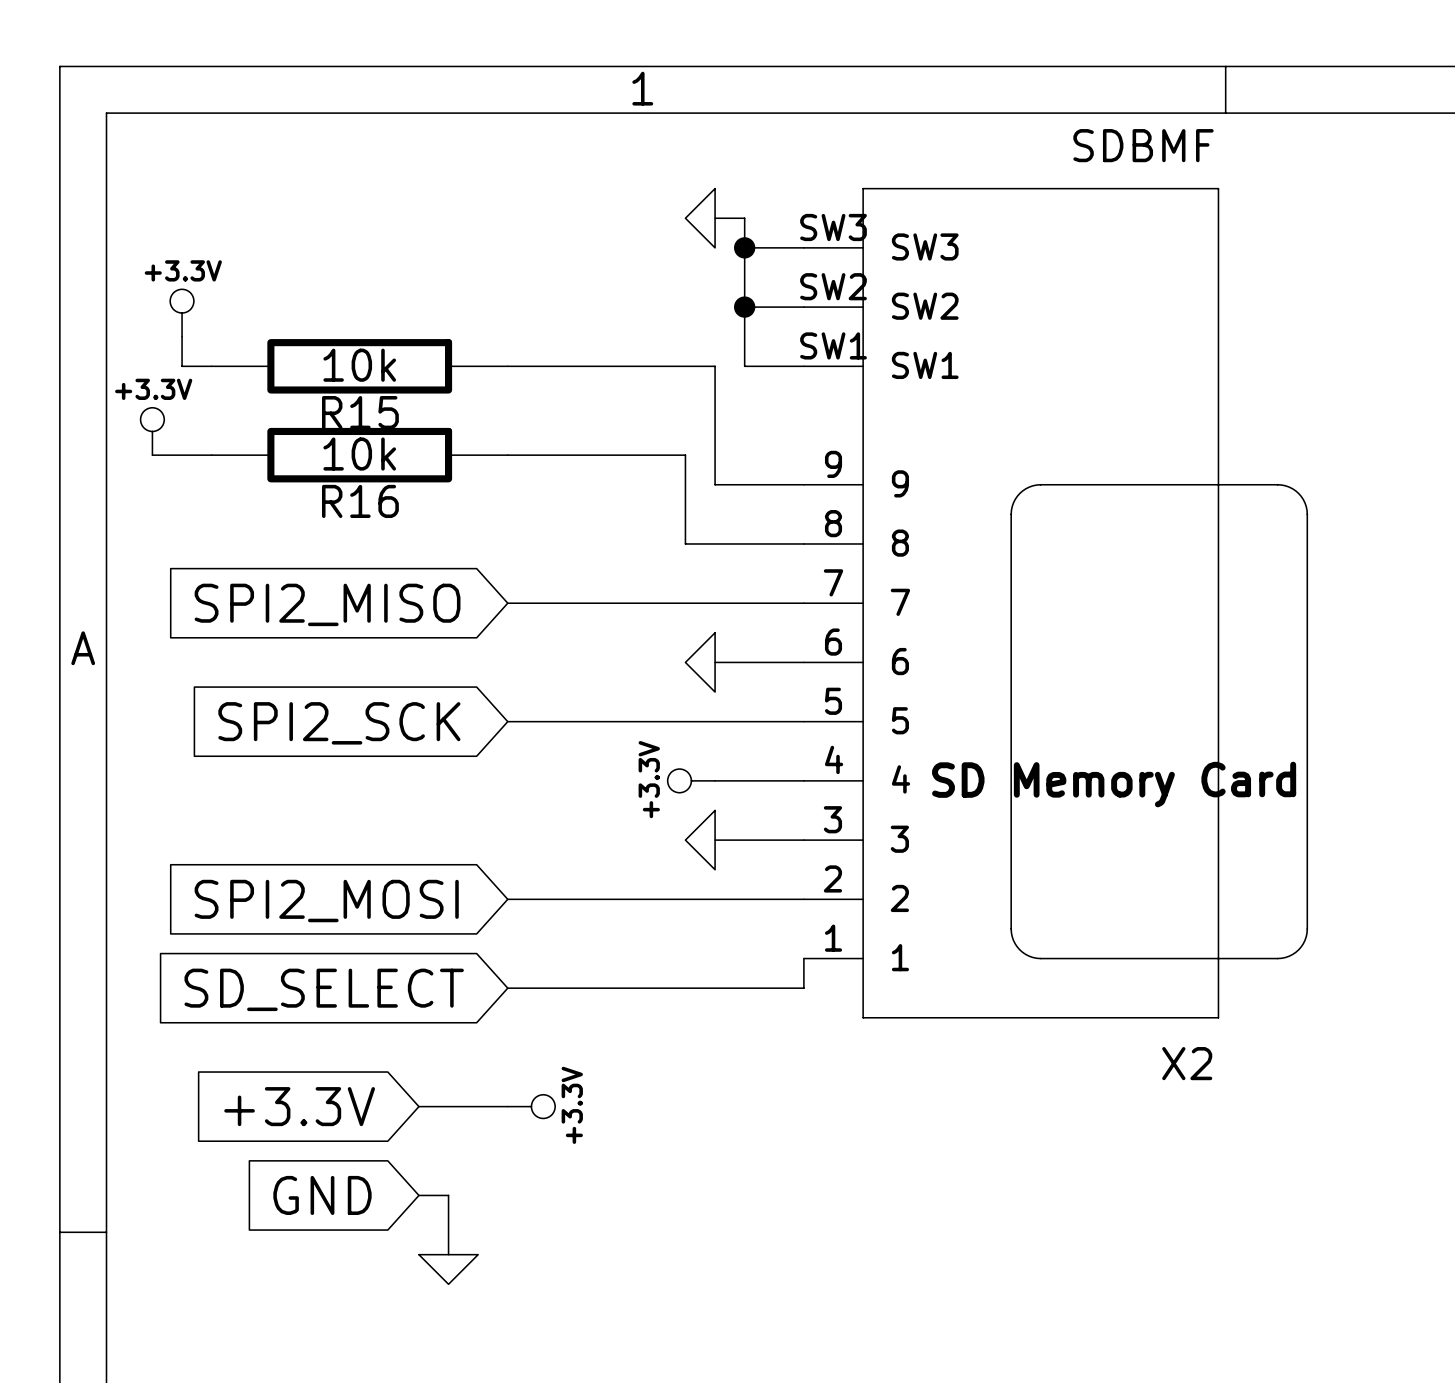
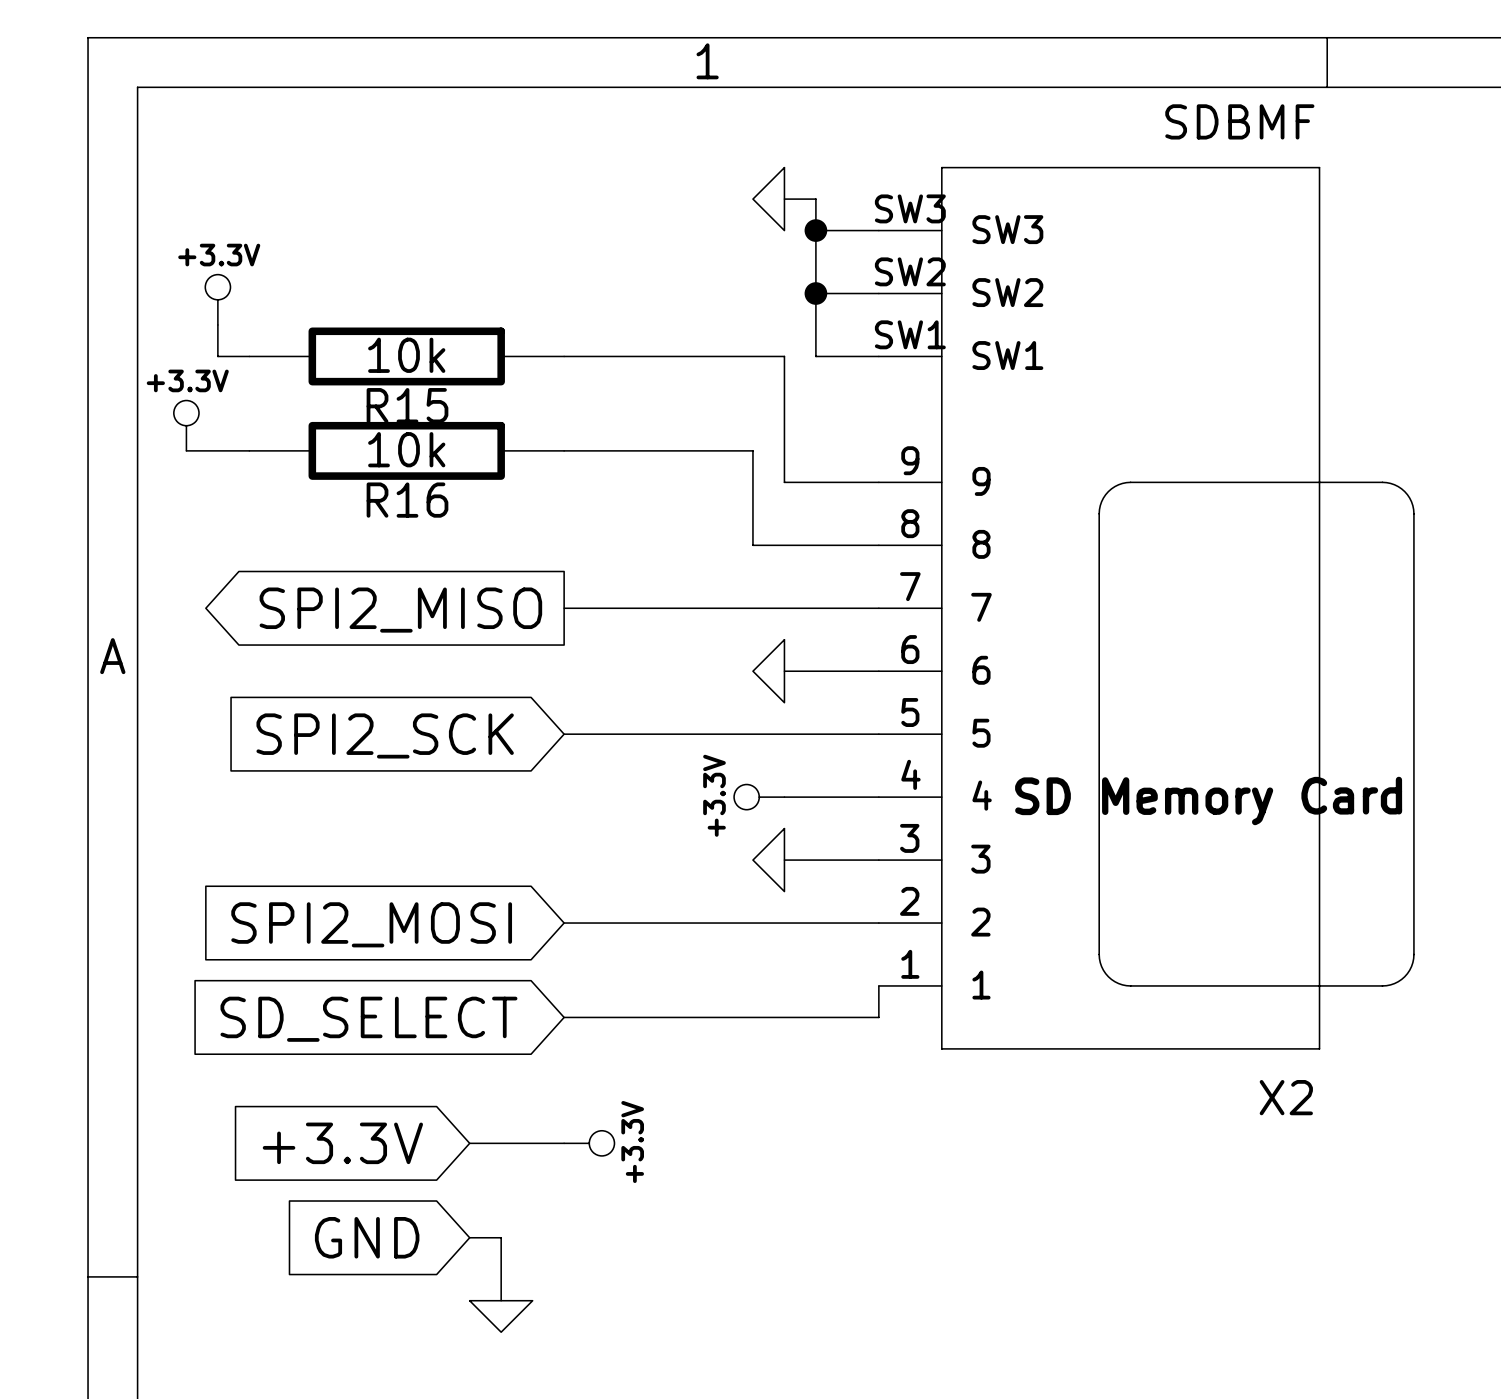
global label shape: input (327, 604) -> output (400, 610)

